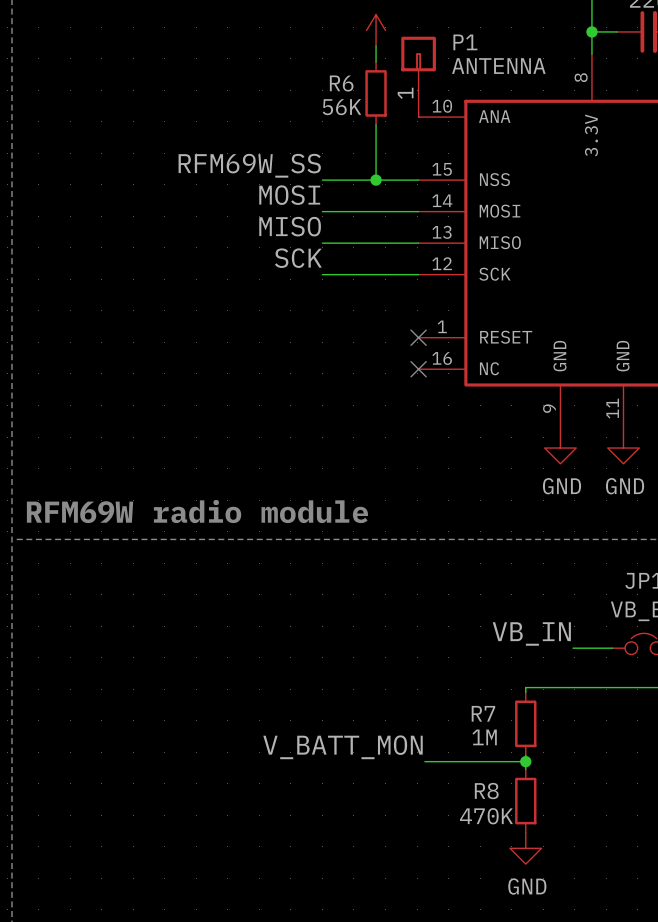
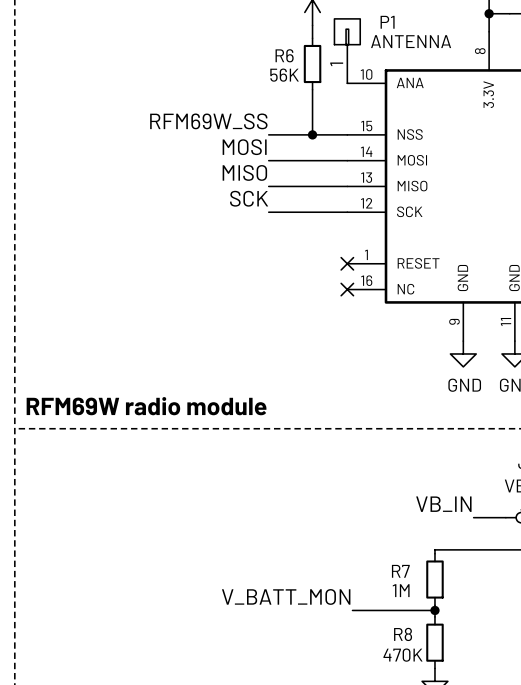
P1 symbol: [401, 36, 436, 118] -> [334, 18, 361, 84]

